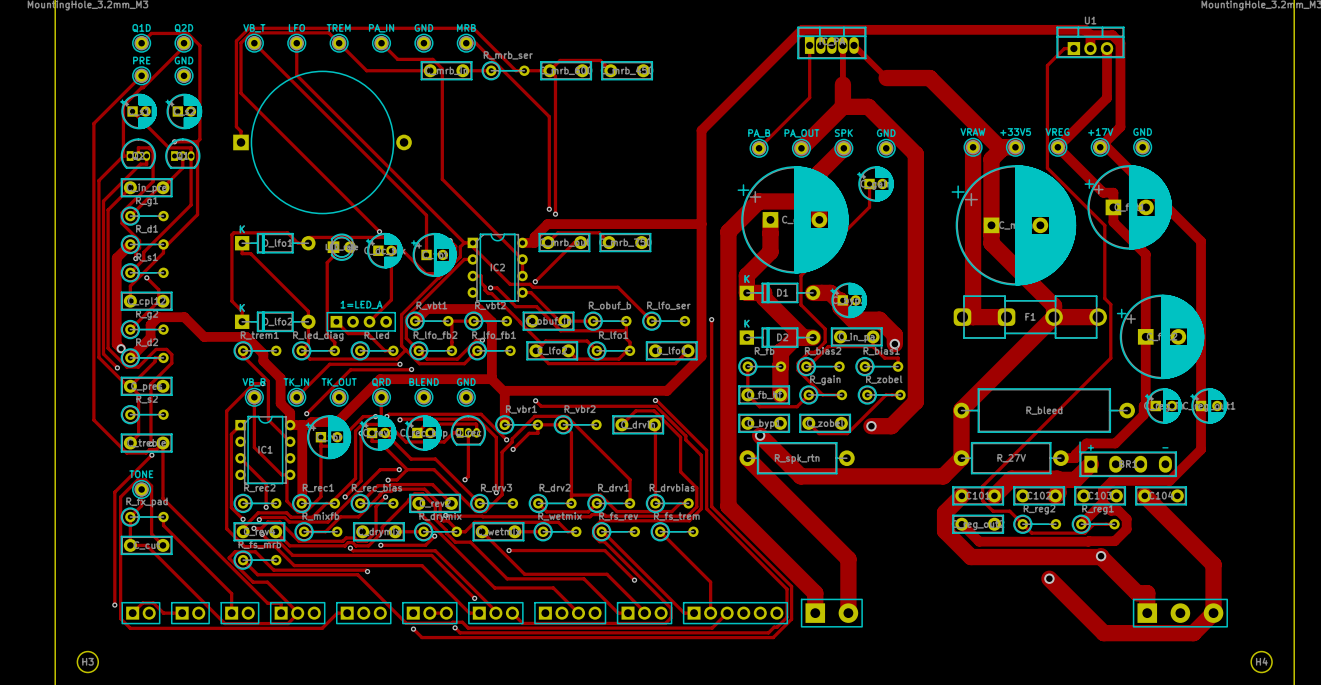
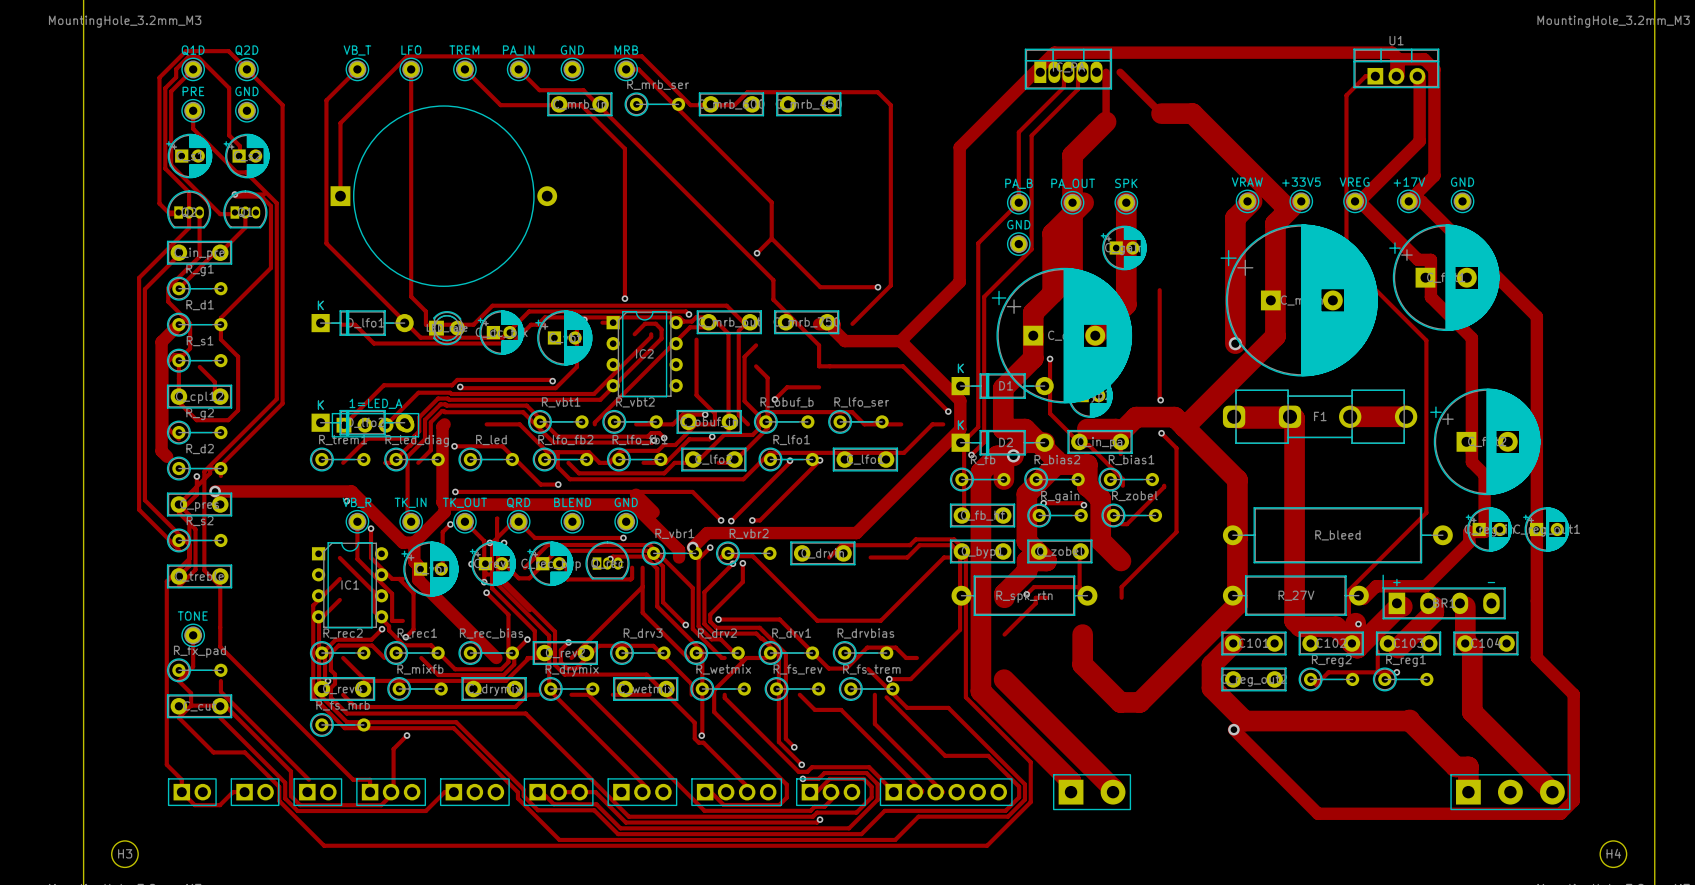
track: (310, 32) (251, 32) (241, 42) (241, 93) (379, 231) -> (407, 56) (340, 123) (340, 196)
track: (328, 32) (366, 70) (430, 70) -> (430, 56) (641, 56) (690, 105) (734, 105) (747, 92) (877, 92) (890, 105) (890, 285) (852, 323)
track: (1090, 35) (1085, 29) (802, 29) (701, 130) (701, 356) (667, 390) (506, 390) (504, 392) (504, 424) -> none
track: (141, 43) (151, 33) (187, 33) (199, 45) (197, 214) (163, 248) -> (193, 69) (171, 91) (171, 165) (220, 214) (235, 214)
track: (184, 43) (184, 46) (123, 105) (123, 156) (98, 180) (98, 357) (127, 386) (130, 386) -> none
track: (254, 43) (426, 215) (426, 254) -> none
part position: (254, 43) -> (357, 69)
track: none -> (357, 69) (326, 100) (326, 243) (420, 337) (502, 337) (529, 311) (686, 311) (688, 314)
track: (296, 43) (296, 75) (464, 242) (460, 246) (460, 256) (401, 314) (401, 345) (419, 363) (464, 363) (477, 350) -> none
part position: (296, 43) -> (411, 69)
track: none -> (411, 69) (411, 296) (425, 311) (425, 324) (473, 324) (492, 305) (726, 305) (745, 324) (738, 330) (738, 415) (748, 424)
part position: (339, 43) -> (464, 69)
track: none -> (464, 69) (500, 105) (581, 105) (624, 148) (624, 298)
track: (381, 43) (397, 59) (432, 59) (442, 68) (442, 179) (522, 259) (522, 276) -> none
part position: (381, 43) -> (518, 69)
track: none -> (518, 69) (539, 90) (583, 90) (773, 280) (773, 299) (819, 345) (819, 366) (903, 366) (948, 411)
part position: (423, 43) -> (572, 69)
track: (466, 43) (475, 43) (549, 116) (549, 209) -> none
part position: (466, 43) -> (626, 69)
track: none -> (626, 69) (638, 69) (771, 202) (771, 238)
track: (809, 45) (809, 97) (759, 148) -> none
track: none -> (1063, 72) (1063, 87) (1018, 132) (1018, 202) (978, 243) (978, 427) (964, 441) (964, 518)
track: none -> (1077, 72) (1077, 89) (1031, 135) (1031, 249) (984, 296) (984, 442) (971, 454)
track: (842, 45) (842, 106) -> none
track: (854, 45) (886, 78) (905, 78) -> (1120, 72) (1161, 113)
track: none -> (1106, 72) (1106, 121) (1072, 155) (1072, 273) (1033, 312) (1033, 358) (1003, 388) (1003, 429) (1025, 429) (1056, 460) (1056, 464)
track: (1066, 48) (1047, 65) (1047, 168) (1104, 225) (1104, 298) (1110, 304) (1110, 358) (982, 486) (982, 500) (993, 511) (1009, 511) (1031, 533) (1084, 533) (1093, 524) (1114, 524) -> (1365, 76) (1346, 95) (1346, 260) (1426, 340) (1426, 512) (1348, 590) (1348, 614) (1358, 624)
track: none -> (1398, 76) (1398, 59) (1392, 52) (1054, 52) (959, 147) (959, 282) (900, 341)
track: (1107, 48) (1107, 98) (1057, 147) (1103, 192) (1113, 192) (1113, 222) (1145, 254) (1145, 405) -> none
track: none -> (1419, 76) (1419, 141) (1359, 201) (1418, 259) (1430, 259) (1430, 297) (1471, 338) (1471, 462) (1484, 474) (1484, 531) (1469, 531) (1469, 542) (1425, 586) (1376, 586) (1363, 598)
track: (462, 70) (491, 70) -> none
track: (549, 70) (515, 70) (473, 28) (249, 28) (236, 41) (236, 126) (241, 131) (241, 142) -> none
track: (549, 70) (560, 60) (600, 60) (610, 70) -> none
track: (549, 70) (555, 76) (555, 214) -> none
track: (141, 75) (93, 123) (93, 420) (126, 453) (146, 453) (149, 449) (156, 449) (162, 443) (162, 450) -> (193, 110) (193, 128) (236, 172) (245, 172) (276, 203) (276, 399) (204, 471) (204, 570) (220, 586)
track: (842, 106) (801, 148) -> none
track: (842, 106) (868, 106) (915, 154) (915, 401) (891, 426) (871, 426) -> none
track: (132, 111) (168, 147) (191, 147) (191, 204) (143, 252) (143, 259) (130, 272) -> none
part position: (322, 142) -> (443, 196)
track: none -> (235, 196) (261, 196) (270, 206) (270, 267) (220, 318) (220, 324)
track: (138, 147) (149, 147) (153, 151) (153, 181) (122, 212) (122, 223) (139, 240) (135, 258) -> (189, 202) (189, 192) (165, 168) (165, 88) (176, 77) (176, 69) (188, 56) (197, 56) (229, 88) (229, 135) (239, 146) (239, 156)
track: (973, 147) (973, 317) -> none
track: none -> (1252, 201) (1235, 218) (1235, 343)
track: (1015, 147) (1003, 147) (991, 159) (991, 243) (1054, 305) (1054, 317) (961, 409) (961, 458) (943, 476) (800, 476) (760, 435) -> none
track: (1106, 147) (1201, 241) (1201, 449) (1169, 480) (1112, 480) (1103, 490) (1103, 502) -> (1417, 201) (1421, 201) (1536, 316) (1536, 657) (1573, 694) (1573, 800) (1560, 813) (1318, 813) (1233, 729)
part position: (759, 148) -> (1018, 202)
part position: (801, 148) -> (1072, 202)
part position: (843, 148) -> (1126, 202)
track: none -> (1126, 202) (1126, 304) (1095, 335)
part position: (886, 148) -> (1018, 244)
track: none -> (1291, 207) (1275, 223) (1275, 336) (1184, 427)
track: none -> (189, 212) (189, 227) (139, 277) (139, 509) (178, 549)
track: none -> (178, 214) (170, 214) (159, 203) (159, 77) (185, 51) (228, 51) (282, 105) (282, 403) (220, 465) (220, 475)
track: (146, 164) (140, 164) (103, 201) (103, 354) (117, 367) -> (199, 222) (199, 256) (168, 287) (168, 301) (190, 323) (190, 348) (183, 355) (174, 355) (166, 363) (166, 426) (178, 439)
track: none -> (771, 238) (820, 287) (877, 287)
track: none -> (771, 238) (757, 253)
track: (869, 184) (869, 207) (800, 275) (800, 304) (825, 329) (825, 342) (815, 352) (808, 352) (798, 363) (798, 370) (822, 394) (841, 394) -> none
track: (130, 187) (108, 210) (108, 348) (126, 367) (138, 367) (156, 349) (166, 349) (171, 354) (171, 363) (150, 383) (150, 444) -> none
via: none -> (757, 253)
track: (819, 201) (758, 201) (728, 231) (728, 506) (815, 593) (815, 613) -> none
via: (549, 209) -> none
via: (555, 214) -> none
via: none -> (877, 287)
track: none -> (1159, 290) (1160, 400)
track: (770, 219) (770, 251) (746, 275) (746, 292) (764, 292) (764, 298) (803, 337) -> none
part position: (793, 219) -> (1061, 335)
via: none -> (624, 298)
track: (701, 224) (547, 224) (534, 237) (534, 242) (522, 242) -> none
via: (379, 231) -> none
via: none -> (688, 314)
track: (450, 240) (455, 246) (455, 255) (437, 273) (425, 273) (389, 237) (308, 237) (303, 243) -> none
track: (468, 242) (510, 284) (530, 284) (533, 287) (617, 287) (651, 321) -> none
track: (548, 242) (557, 232) (599, 232) (609, 242) -> none
track: (580, 242) (574, 242) (535, 281) -> none
track: (242, 243) (242, 253) (250, 253) (308, 311) (308, 344) (301, 350) (309, 359) (396, 359) (405, 350) -> none
track: (308, 243) (297, 243) (287, 232) (233, 232) (231, 234) (231, 301) (242, 311) (242, 321) -> none
track: none -> (341, 324) (355, 324) (373, 343) (512, 343) (531, 324) (544, 324)
track: none -> (537, 324) (544, 317) (679, 317) (683, 321) (691, 321) (695, 317) (712, 317) (728, 333) (728, 434)
track: none -> (709, 324) (707, 327) (690, 327) (594, 424)
track: none -> (819, 324) (834, 324) (834, 330) (844, 341) (900, 341)
track: (333, 247) (333, 256) (327, 262) (327, 334) (334, 342) (334, 350) -> none
track: none -> (576, 329) (576, 366) (555, 388) (460, 386)
track: (391, 250) (391, 299) (369, 321) -> none
track: (163, 252) (130, 286) -> (220, 335) (220, 339) (238, 356) (238, 410) (228, 420) (196, 420) (178, 402)
track: none -> (634, 334) (645, 323) (655, 323) (661, 329) (661, 338) (600, 399) (438, 398) (419, 417) (419, 431) (414, 436) (414, 441) (395, 459) (395, 462) (385, 462)
track: none -> (651, 334) (651, 336) (594, 394) (418, 392) (386, 425)
track: none -> (696, 339) (696, 395) (714, 413) (714, 424) (695, 424) (675, 445) (663, 445) (657, 450) (621, 450) (609, 462)
track: none -> (900, 341) (960, 400) (960, 429) (856, 533) (707, 533) (692, 547)
via: (135, 258) -> none
track: (472, 259) (464, 259) (406, 317) (406, 338) (427, 359) (457, 359) (476, 340) (482, 340) -> none
via: none -> (1235, 343)
track: none -> (756, 345) (744, 356) (744, 401) (758, 415) (758, 428) (752, 434) (724, 434) (696, 462) (674, 462) (664, 473) (578, 473) (568, 462)
track: none -> (1050, 358) (1050, 413) (1081, 445) (1089, 445) (1122, 479) (1122, 485)
via: none -> (1050, 358)
track: none -> (178, 365) (178, 377)
track: (472, 276) (481, 276) (481, 283) (485, 286) (485, 290) (491, 293) (542, 344) -> none
via: (146, 277) -> none
track: none -> (756, 366) (767, 377) (767, 428) (733, 462) (718, 462)
via: (535, 281) -> none
track: (490, 287) (497, 287) (515, 306) (536, 306) (560, 330) (626, 330) -> none
via: (490, 287) -> none
track: none -> (552, 381) (457, 379) (451, 385) (383, 385) (343, 425)
via: none -> (552, 381)
track: (522, 292) (530, 292) (559, 321) (593, 321) -> none
track: (813, 292) (830, 292) (837, 300) (840, 300) -> none
via: none -> (460, 386)
track: none -> (819, 387) (787, 387) (774, 399)
track: (840, 300) (840, 307) (852, 319) (879, 319) (894, 335) (894, 344) -> none
track: (158, 301) (130, 329) -> none
via: none -> (774, 399)
via: none -> (1160, 400)
via: none -> (948, 411)
track: none -> (767, 412) (852, 412) (864, 424) (901, 424)
track: none -> (705, 414) (682, 414) (672, 424) (636, 424)
via: none -> (705, 414)
track: none -> (1238, 418) (1294, 418) (1294, 620) (1300, 626) (1336, 626) (1357, 648) (1398, 606) (1402, 606)
track: (711, 319) (711, 506) (791, 586) (791, 619) (773, 637) (421, 637) (413, 629) -> none
via: (711, 319) -> none
track: (336, 321) (348, 333) (367, 333) (384, 350) (393, 350) -> none
part position: (361, 321) -> (375, 425)
track: (415, 321) (427, 308) (478, 308) (491, 321) (491, 377) (490, 379) (380, 379) (337, 422) (311, 422) (308, 425) (290, 425) (290, 413) (280, 403) (280, 378) (263, 361) (263, 353) (246, 336) (204, 336) (184, 317) (158, 317) (150, 324) (150, 337) (130, 357) -> none
track: (448, 321) (473, 321) -> none
track: (451, 321) (451, 350) -> none
track: (626, 321) (626, 338) (630, 342) (630, 350) -> none
track: none -> (444, 424) (442, 426) (442, 502) (444, 504)
track: none -> (486, 424) (519, 424) (547, 452) (589, 452) (599, 462) (610, 462)
track: none -> (943, 424) (932, 424) (904, 452) (769, 452) (743, 479) (569, 479) (557, 467) (557, 452)
track: none -> (1087, 429) (1116, 429) (1120, 433) (1136, 417) (1174, 417) (1237, 479) (1237, 604) (1139, 702) (1120, 702) (1082, 664) (1082, 634)
track: none -> (1161, 433) (1176, 448) (1176, 532) (1121, 587) (1121, 597)
via: none -> (1161, 433)
track: none -> (712, 436) (709, 439) (689, 439) (665, 462) (643, 462)
via: none -> (712, 436)
track: none -> (664, 438) (659, 433) (651, 433) (647, 436) (557, 436) (526, 405) (440, 404) (425, 419) (425, 439) (407, 456) (407, 518) (411, 521)
via: none -> (664, 438)
track: none -> (407, 438) (367, 438) (343, 462)
track: none -> (654, 440) (652, 442) (553, 442) (523, 412) (442, 410) (430, 422) (430, 450) (418, 462)
via: none -> (654, 440)
track: none -> (454, 446) (502, 446) (540, 484) (558, 484)
via: none -> (454, 446)
via: (482, 340) -> none
via: (894, 344) -> none
track: (630, 347) (618, 359) (576, 359) (568, 350) -> none
via: none -> (971, 454)
track: none -> (1013, 455) (997, 455) (980, 472) (980, 691) (1071, 781) (1071, 792)
via: none -> (1013, 455)
via: (121, 348) -> none
track: (243, 350) (243, 356) (268, 381) (268, 419) (290, 441) -> none
track: (596, 350) (587, 341) (545, 341) (535, 350) (548, 363) (675, 363) (688, 350) -> none
track: none -> (790, 460) (731, 521)
via: none -> (790, 460)
track: none -> (820, 460) (759, 520) (752, 520)
via: none -> (820, 460)
track: none -> (1056, 464) (1087, 464) (1087, 486) (1100, 499) (1100, 540) (1120, 560)
track: none -> (1056, 464) (1026, 494) (1026, 541) (1046, 560) (1027, 560) (1027, 571) (1004, 593) (1004, 597)
track: none -> (196, 476) (196, 494) (178, 512) (195, 529) (195, 569) (178, 586)
track: (400, 364) (329, 364) (296, 397) -> none
via: (400, 364) -> none
track: (780, 365) (780, 394) -> none
track: (747, 366) (747, 394) (759, 406) (797, 406) (808, 394) -> none
track: (806, 366) (828, 346) (873, 346) (884, 358) (898, 358) (898, 366) -> none
via position: (117, 367) -> (196, 476)
track: (411, 369) (350, 369) (306, 413) -> none
via: (411, 369) -> none
via: none -> (558, 484)
track: none -> (1164, 485) (1127, 524) (1121, 524)
track: none -> (215, 491) (351, 491) (402, 542) (414, 542)
via: none -> (215, 491)
track: none -> (455, 491) (692, 491) (721, 520)
via: none -> (455, 491)
track: (262, 383) (254, 383) (226, 411) (226, 528) (244, 546) (275, 546) (294, 565) (422, 565) (469, 613) (479, 613) -> none
track: none -> (1043, 503) (1081, 503) (1083, 505)
via: none -> (1043, 503)
track: none -> (444, 504) (444, 512) (414, 542)
track: none -> (444, 504) (633, 504) (679, 550) (679, 557)
via: none -> (1083, 505)
track: (900, 394) (886, 394) (847, 433) (819, 433) (808, 423) -> none
track: (254, 397) (254, 447) (281, 474) (290, 474) -> none
part position: (254, 397) -> (357, 521)
part position: (296, 397) -> (411, 521)
part position: (339, 397) -> (464, 521)
part position: (381, 397) -> (518, 521)
part position: (423, 397) -> (572, 521)
part position: (466, 397) -> (626, 521)
via: none -> (721, 520)
via: none -> (752, 520)
track: none -> (357, 521) (357, 559) (392, 593) (392, 620) (402, 620)
track: none -> (464, 521) (484, 541) (484, 582)
via: none -> (731, 521)
track: (535, 400) (541, 406) (656, 406) (685, 436) (685, 439) (701, 455) (701, 508) (689, 520) (601, 520) (593, 528) (593, 535) (599, 541) (604, 541) (671, 608) (671, 617) (665, 623) (522, 623) (512, 613) -> none
via: (535, 400) -> none
track: (655, 400) (706, 450) (706, 508) (787, 589) (787, 617) (768, 632) (460, 632) (455, 627) -> none
via: (655, 400) -> none
track: none -> (450, 524) (442, 532) (442, 573)
via: none -> (450, 524)
track: none -> (371, 528) (371, 557) (392, 578) (402, 578)
via: none -> (371, 528)
track: (1155, 405) (1143, 405) (1143, 415) (1115, 443) (1086, 443) (1075, 454) (1075, 458) (1060, 458) -> none
track: none -> (623, 537) (534, 537) (518, 521) (513, 521) (492, 543) (492, 588) (534, 631) (534, 657)
via: none -> (623, 537)
via: (306, 413) -> none
track: none -> (414, 542) (414, 561) (418, 565) (418, 579) (496, 657)
track: (375, 416) (363, 416) (347, 432) (347, 439) (341, 446) (320, 446) -> none
track: none -> (502, 542) (497, 547) (497, 584) (549, 635) (549, 689) (647, 788) (647, 792)
track: (386, 416) (389, 414) (481, 414) (506, 439) -> none
track: (400, 419) (477, 419) (496, 437) (496, 492) -> none
via: (400, 419) -> none
via: none -> (692, 547)
track: none -> (710, 547) (698, 559) (698, 626) (711, 639) (720, 639) (742, 661)
via: none -> (710, 547)
track: (621, 424) (635, 410) (654, 410) (680, 437) (680, 471) (696, 488) (696, 506) (687, 516) (445, 515) -> none
track: (654, 424) (655, 503) -> none
track: (240, 425) (231, 434) (231, 507) (243, 519) -> none
track: (302, 425) (301, 503) -> none
via: (871, 426) -> none
track: none -> (339, 557) (374, 592) (374, 611) (404, 645) (431, 645) (455, 669) (501, 669) (508, 662) (508, 614) (486, 592)
track: none -> (721, 557) (752, 556) (817, 620) (880, 620) (944, 557) (949, 557)
track: none -> (829, 557) (841, 545) (910, 545) (915, 539) (954, 539) (965, 551) (965, 697) (1030, 762) (1030, 802) (987, 845) (324, 845) (279, 800) (279, 786) (244, 752) (213, 752) (178, 717) (191, 705)
track: none -> (870, 557) (907, 557) (919, 545) (951, 545) (960, 553) (960, 629) (910, 679) (889, 679)
track: none -> (610, 559) (612, 556) (644, 556) (657, 568) (657, 606) (702, 651) (701, 735)
via: none -> (610, 559)
track: none -> (1079, 560) (1079, 597)
track: (385, 432) (411, 459) (435, 459) (479, 503) -> none
track: (460, 432) (453, 432) (444, 441) (405, 441) (388, 424) (362, 424) (355, 430) (355, 478) (330, 503) -> none
track: (468, 432) (468, 476) (465, 479) -> none
track: (476, 432) (476, 424) (426, 424) (417, 432) -> none
track: none -> (732, 563) (704, 592) (704, 624) (713, 633) (756, 633) (778, 655) (778, 741) (801, 764)
via: none -> (732, 563)
track: none -> (742, 563) (742, 582) (710, 614) (710, 621) (716, 627) (759, 627) (785, 653) (785, 738) (794, 747)
via: none -> (742, 563)
track: (361, 433) (361, 480) (345, 496) -> none
via: (760, 435) -> none
track: none -> (508, 567) (518, 578) (529, 578) (556, 550) (647, 550) (663, 566) (663, 602) (685, 624)
track: none -> (524, 567) (547, 545) (649, 545) (692, 588) (692, 628) (721, 657) (724, 657)
track: none -> (632, 567) (630, 579) (567, 579) (566, 567)
track: none -> (642, 567) (642, 612) (687, 657)
track: (320, 437) (320, 496) (305, 512) (297, 512) (286, 501) (286, 474) -> none
via: (506, 439) -> none
via: (150, 444) -> none
track: none -> (339, 578) (313, 605) (313, 696) (344, 728) (453, 728) (517, 792) (517, 798) (559, 839) (895, 839) (918, 816) (1008, 816) (1024, 799) (1024, 784) (948, 707) (907, 707) (868, 669)
track: none -> (399, 578) (413, 593) (413, 629) (405, 637)
via: none -> (484, 582)
track: none -> (505, 582) (555, 631) (555, 665) (564, 674) (646, 674) (694, 722) (694, 738) (698, 742) (703, 742) (752, 792)
track: (513, 449) (529, 433) (537, 433) (537, 424) (563, 424) (571, 432) (571, 503) -> none
via: (513, 449) -> none
track: none -> (642, 586) (571, 657)
track: none -> (1079, 587) (1034, 587) (1026, 594)
track: (151, 455) (114, 492) (114, 605) -> none
via: (151, 455) -> none
via: none -> (486, 592)
via: none -> (1026, 594)
track: (240, 458) (266, 483) (266, 507) -> none
track: (747, 458) (848, 559) (848, 613) -> none
track: none -> (1046, 597) (1035, 597) (1035, 603) (1004, 634)
track: none -> (339, 599) (319, 620) (319, 694) (347, 722) (456, 722) (523, 789) (523, 796) (537, 810) (594, 810) (618, 834) (861, 834) (884, 810) (1005, 810) (1019, 797) (1019, 786) (988, 755) (945, 755) (886, 697)
track: (1090, 464) (1075, 479) (1011, 478) (994, 495) -> none
track: none -> (1433, 606) (1433, 612) (1398, 648)
track: none -> (1465, 606) (1465, 641) (1472, 648) (1472, 712) (1552, 792)
track: (399, 469) (380, 469) (327, 522) (289, 522) (284, 517) (261, 517) (259, 519) -> none
via: (399, 469) -> none
track: none -> (718, 619) (779, 619) (828, 668) (846, 668) (867, 647) (895, 647) (906, 657) (916, 657)
via: none -> (718, 619)
via: (465, 479) -> none
track: (388, 480) (396, 479) (407, 469) (434, 469) (476, 511) (485, 511) (502, 494) (502, 452) (512, 442) (512, 438) (534, 416) (566, 416) (630, 479) (630, 503) -> none
via: (388, 480) -> none
via: none -> (1358, 624)
via: none -> (685, 624)
track: none -> (382, 629) (371, 639) (335, 639) (325, 650) (325, 678) (327, 680)
via: none -> (382, 629)
via: none -> (405, 637)
track: none -> (527, 639) (514, 652) (514, 664) (503, 675) (438, 675) (421, 657)
via: none -> (527, 639)
via: (496, 492) -> none
track: none -> (568, 642) (560, 650) (560, 662) (567, 668) (576, 668) (598, 645) (653, 645) (691, 684) (691, 694)
via: none -> (568, 642)
track: (571, 495) (600, 495) (616, 511) (671, 511) (680, 503) (688, 503) -> none
track: (1144, 495) (1213, 564) (1213, 613) (1193, 633) (1103, 633) (1049, 578) -> none
via: (345, 496) -> none
track: (385, 497) (376, 506) (376, 531) (366, 541) (357, 541) (354, 537) (346, 537) (342, 541) (299, 541) (279, 522) (267, 522) (261, 528) (253, 528) -> none
via: (385, 497) -> none
track: none -> (1377, 651) (1377, 672)
track: (1103, 502) (1111, 510) (1118, 510) (1126, 518) (1126, 529) (1114, 541) (979, 541) (961, 524) -> none
track: (1103, 502) (1081, 524) -> none
track: (334, 503) (326, 503) (312, 517) (291, 517) (286, 512) (258, 512) (243, 528) (243, 531) -> none
track: (360, 503) (377, 485) (391, 484) (432, 484) (451, 503) -> none
track: (418, 503) (418, 512) (494, 588) (553, 588) (578, 613) -> none
track: (538, 503) (546, 511) (588, 511) (596, 503) -> none
track: (141, 505) (130, 517) (130, 545) (146, 545) (224, 623) (288, 623) (297, 613) (267, 582) (253, 582) (229, 558) (235, 551) (255, 551) (273, 570) (367, 571) -> (193, 656) (193, 666) (178, 681) (191, 693) (191, 705)
track: none -> (343, 657) (366, 680) (506, 680) (527, 657) (538, 657)
via: (266, 507) -> none
track: none -> (384, 657) (372, 645) (338, 645) (330, 653) (330, 670) (335, 674) (335, 683) (330, 687) (330, 697) (346, 713) (525, 713) (628, 816) (812, 816) (817, 812) (856, 812) (871, 797) (871, 786) (863, 778) (829, 778) (816, 792)
track: none -> (766, 657) (746, 657) (714, 690) (714, 712) (786, 784) (786, 797) (779, 805) (723, 805) (710, 792)
via: (445, 515) -> none
track: (163, 517) (163, 525) (231, 593) (231, 613) -> none
track: none -> (1396, 672) (1328, 672) (1315, 684)
via: none -> (1396, 672)
via: (243, 519) -> none
via: (259, 519) -> none
via: none -> (889, 679)
track: none -> (1004, 679) (1113, 788) (1113, 792)
track: none -> (220, 681) (220, 691) (308, 779)
via: none -> (327, 680)
via: (253, 528) -> none
track: (275, 531) (289, 545) (344, 545) (348, 542) (352, 542) (355, 545) (368, 545) (382, 532) (382, 527) (414, 493) (422, 493) (435, 506) (435, 519) (446, 530) (446, 533) (455, 542) (470, 542) (507, 578) (583, 578) (618, 613) (628, 613) -> none
track: (304, 531) (325, 531) (340, 516) (358, 516) (383, 491) (391, 491) (393, 489) (424, 489) (440, 504) (440, 517) (443, 520) (448, 520) (458, 531) -> none
track: (395, 531) (423, 531) -> none
track: (456, 531) (465, 531) (474, 522) (558, 522) (567, 531) (576, 531) -> none
track: (482, 531) (524, 574) (606, 574) (644, 613) -> none
track: (514, 531) (543, 531) -> none
track: (601, 531) (684, 613) (690, 613) -> (724, 694) (724, 697) (798, 771) (807, 771) (811, 767) (869, 767) (888, 786) (888, 792)
track: (660, 531) (710, 582) (710, 613) -> none
track: (262, 534) (269, 542) (279, 542) (292, 555) (431, 555) (474, 598) -> none
via: (262, 534) -> none
track: none -> (343, 694) (355, 707) (515, 707) (527, 694) (538, 694)
track: (434, 536) (425, 545) (380, 545) -> none
via: (434, 536) -> none
track: none -> (571, 694) (588, 694) (704, 810) (810, 810) (814, 806) (824, 806) (837, 792)
track: none -> (612, 694) (649, 694)
track: none -> (799, 694) (814, 709) (841, 709) (922, 792)
track: none -> (874, 694) (874, 723) (943, 792)
track: none -> (191, 705) (225, 705) (290, 771) (290, 796) (300, 805) (381, 805) (393, 792) (393, 749) (407, 735)
track: (162, 545) (151, 534) (151, 486) (145, 479) (137, 479) (120, 497) (120, 618) (130, 628) (322, 628) (337, 613) (340, 613) -> (220, 717) (285, 782) (285, 798) (297, 811) (425, 811) (444, 792)
via: (380, 545) -> none
track: (350, 548) (353, 550) (435, 550) (495, 613) -> none
via: (350, 548) -> none
track: (509, 550) (604, 550) (634, 580) -> none
via: (509, 550) -> none
via: (1101, 556) -> none
track: (243, 560) (257, 574) (357, 574) (406, 623) (462, 622) (468, 628) (712, 628) (727, 613) -> none
via: none -> (1233, 729)
via: none -> (407, 735)
via: none -> (701, 735)
via: (367, 571) -> none
via: none -> (794, 747)
via: (1049, 578) -> none
via: (634, 580) -> none
via: none -> (801, 764)
via: (474, 598) -> none
track: none -> (802, 778) (818, 778) (824, 773) (866, 773) (877, 784) (877, 799) (849, 828) (620, 828) (596, 804) (553, 804) (541, 792)
via: none -> (802, 778)
via: (114, 605) -> none
track: (132, 613) (142, 603) (153, 603) (163, 613) (173, 613) -> (178, 255) (144, 289) (144, 500) (189, 545) (189, 558) (166, 581) (166, 764) (181, 779) (181, 792) (194, 805) (219, 805) (232, 792)
track: none -> (579, 792) (595, 792) (625, 822) (817, 822) (820, 819)
part position: (831, 613) -> (1092, 792)
via: (455, 627) -> none
via: (413, 629) -> none
via: none -> (820, 819)

